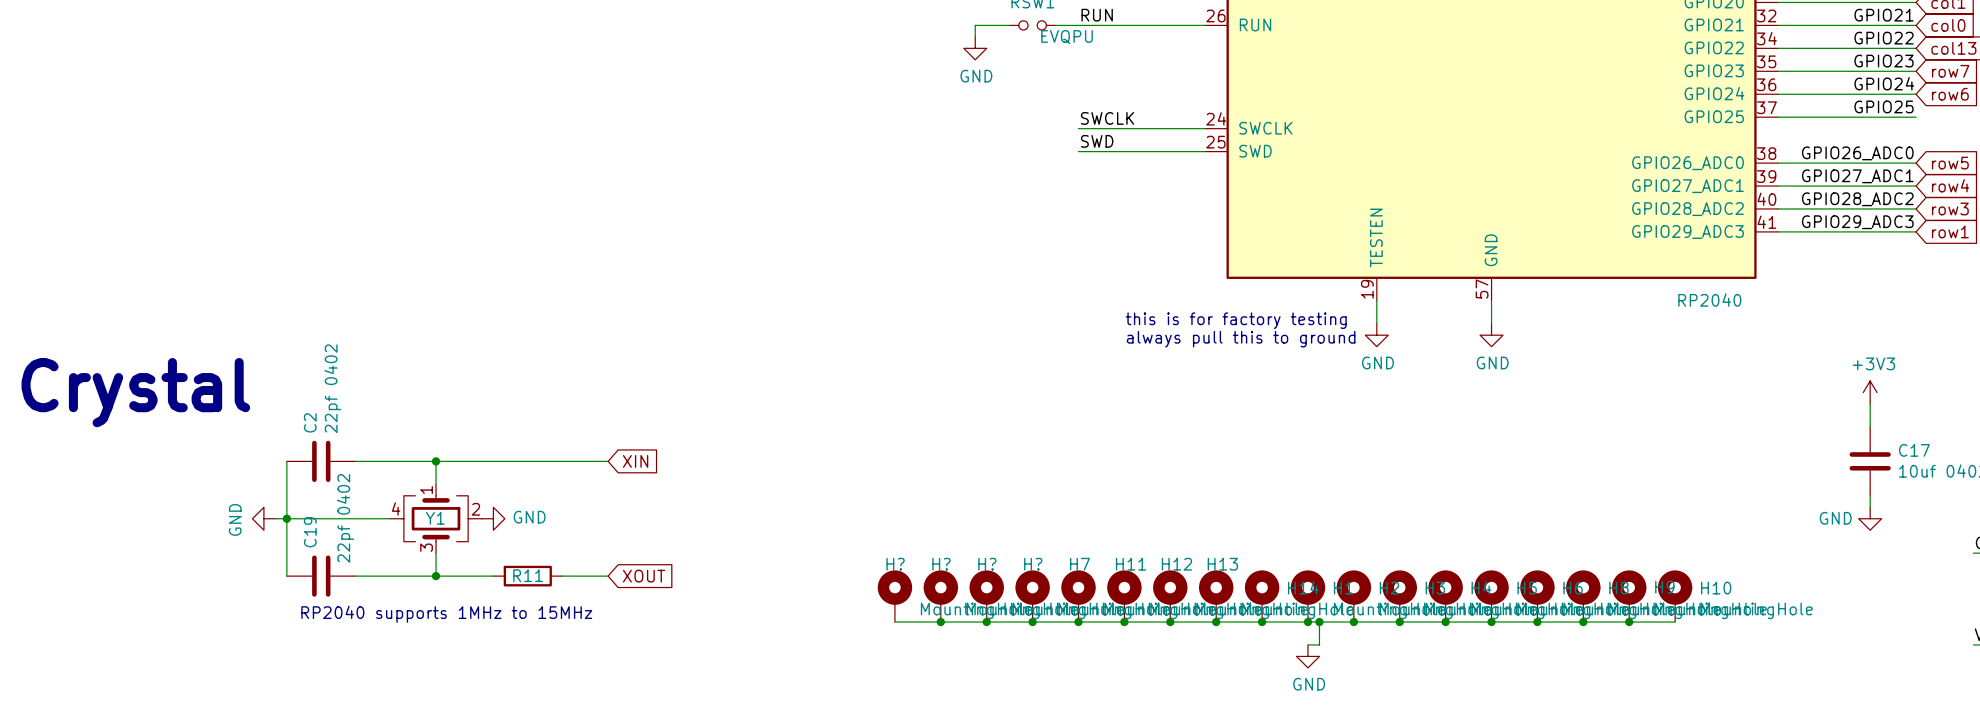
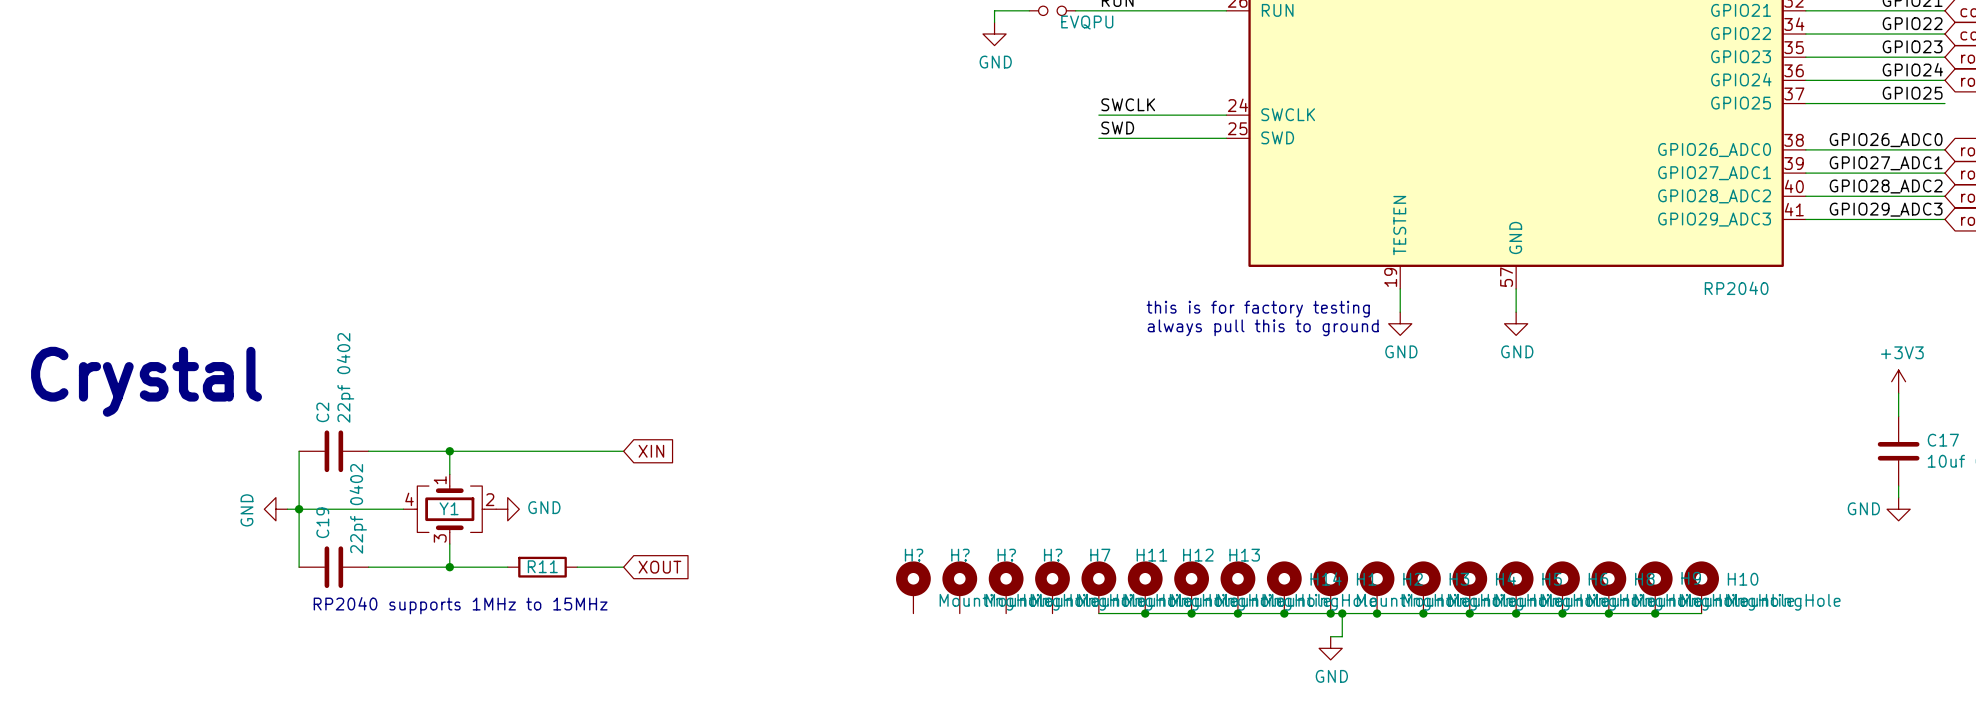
wire: (894, 622) (1078, 622) -> none
junction: (940, 622) -> none
junction: (986, 622) -> none
junction: (1032, 622) -> none
junction: (1078, 622) -> none

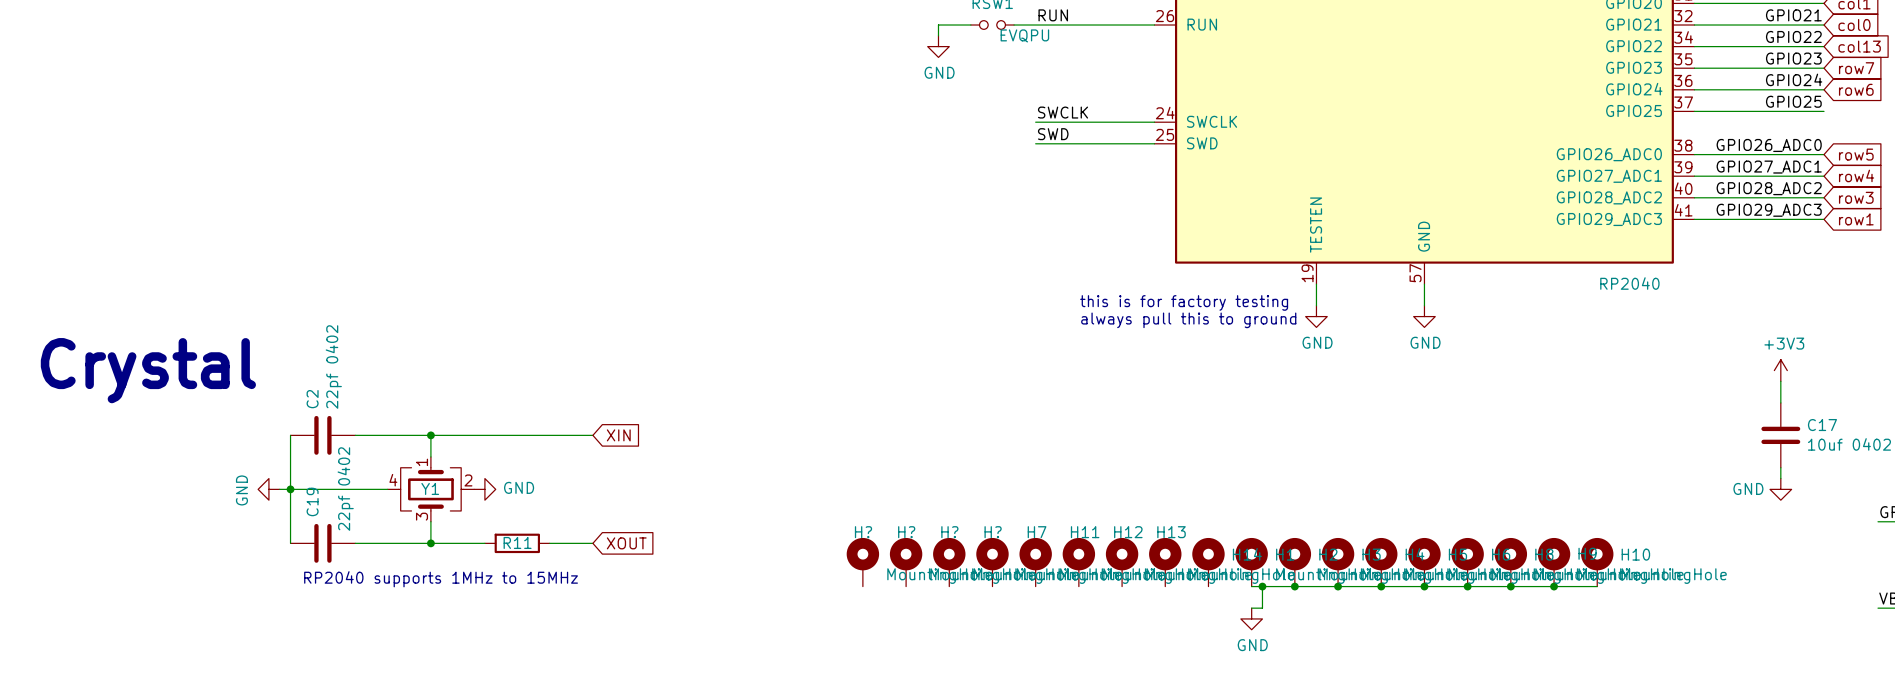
wire: (1098, 613) (1330, 613) -> none
junction: (1145, 613) -> none
junction: (1191, 613) -> none
junction: (1237, 613) -> none
junction: (1284, 613) -> none
junction: (1330, 613) -> none

